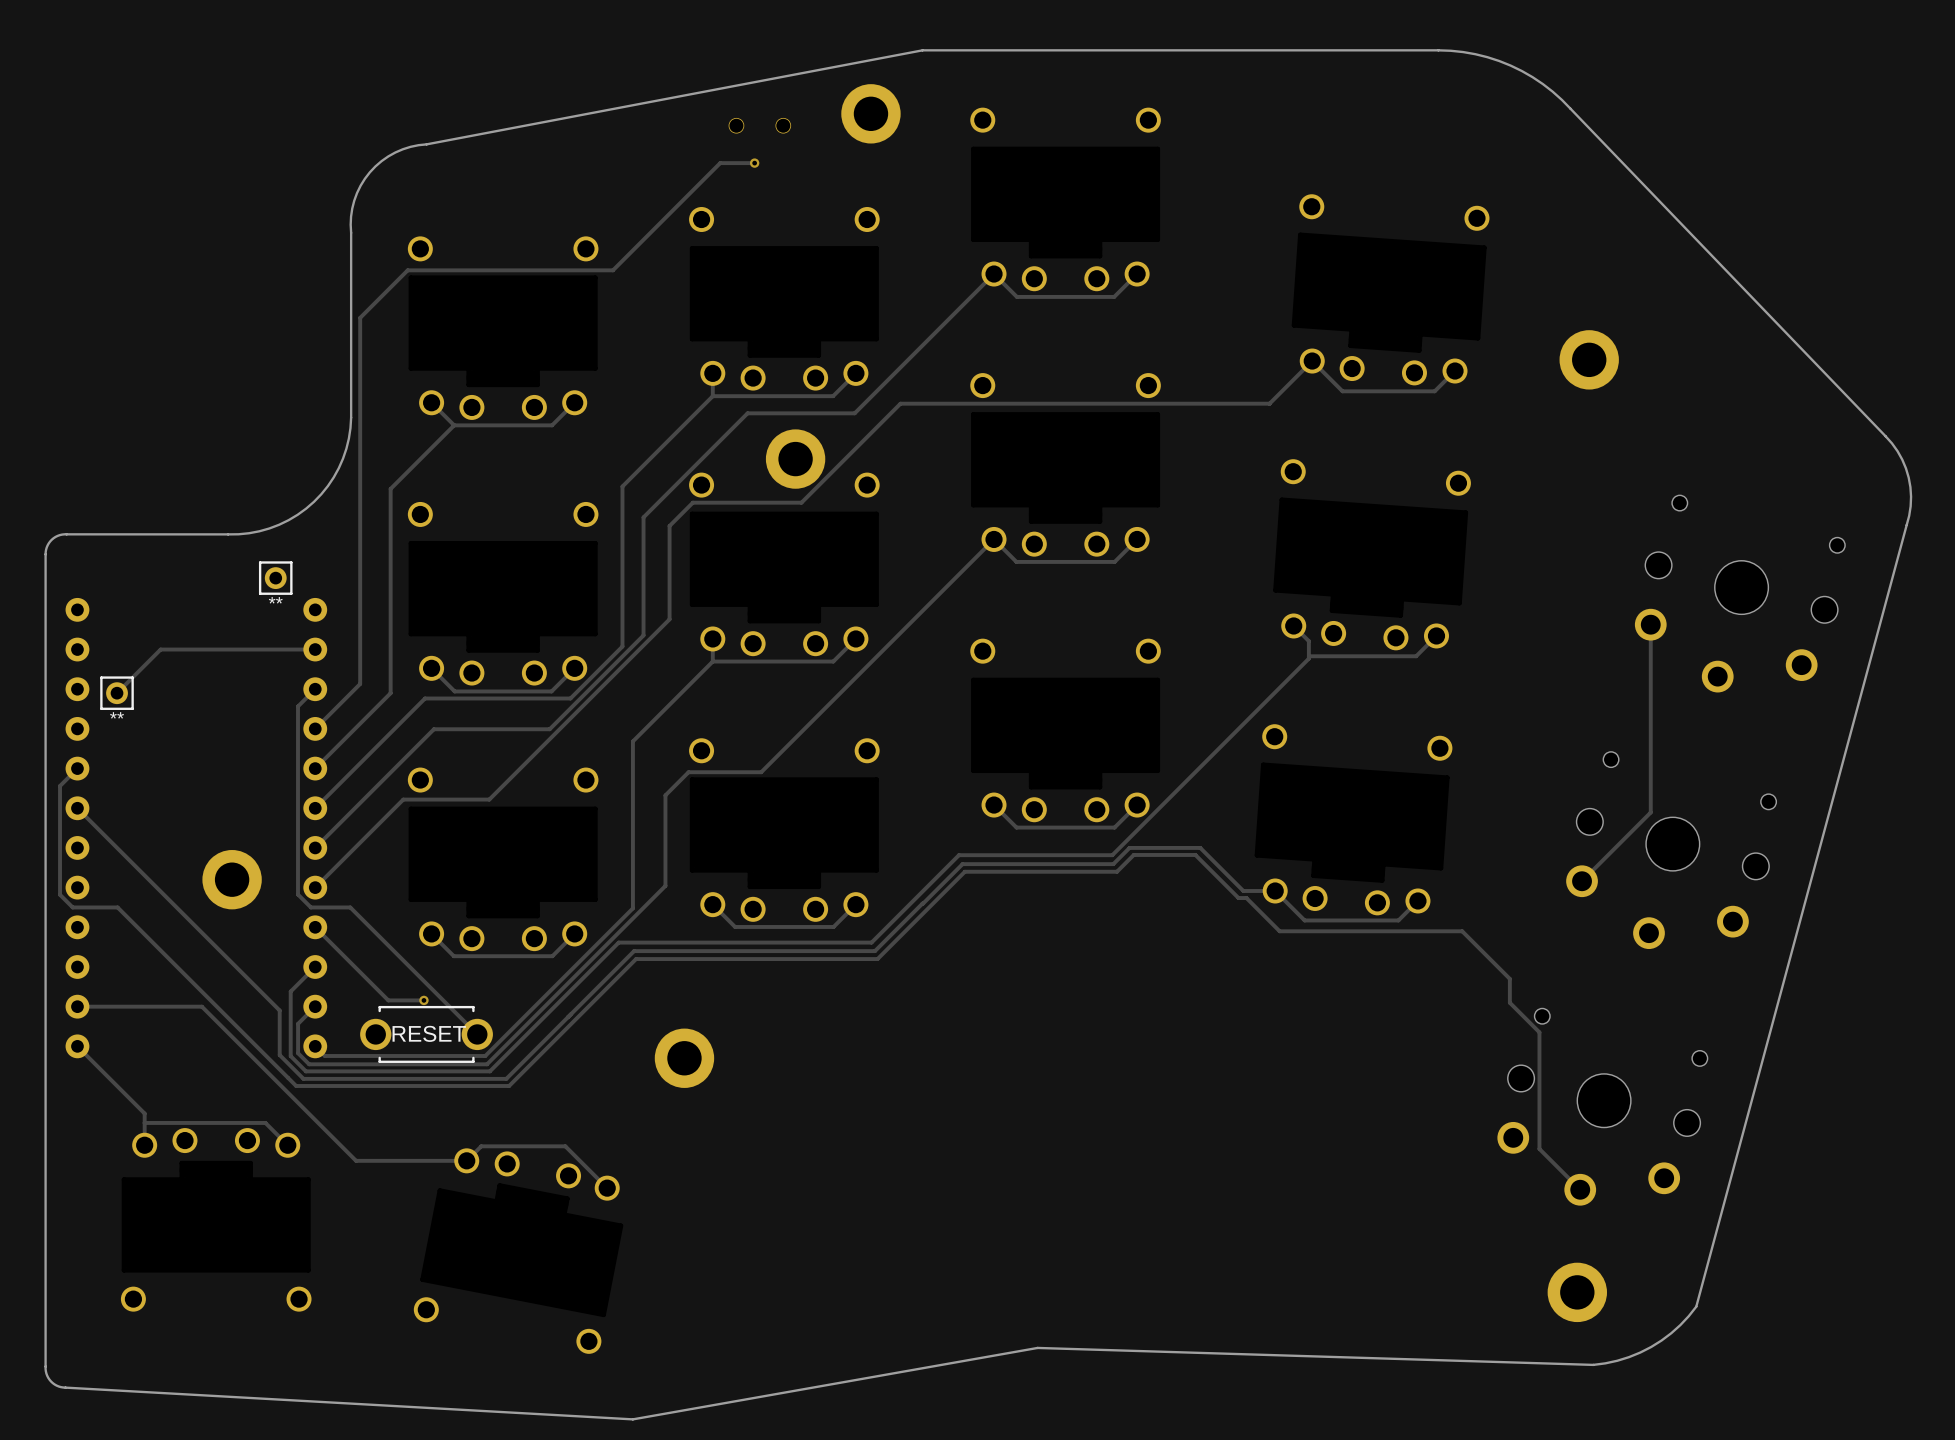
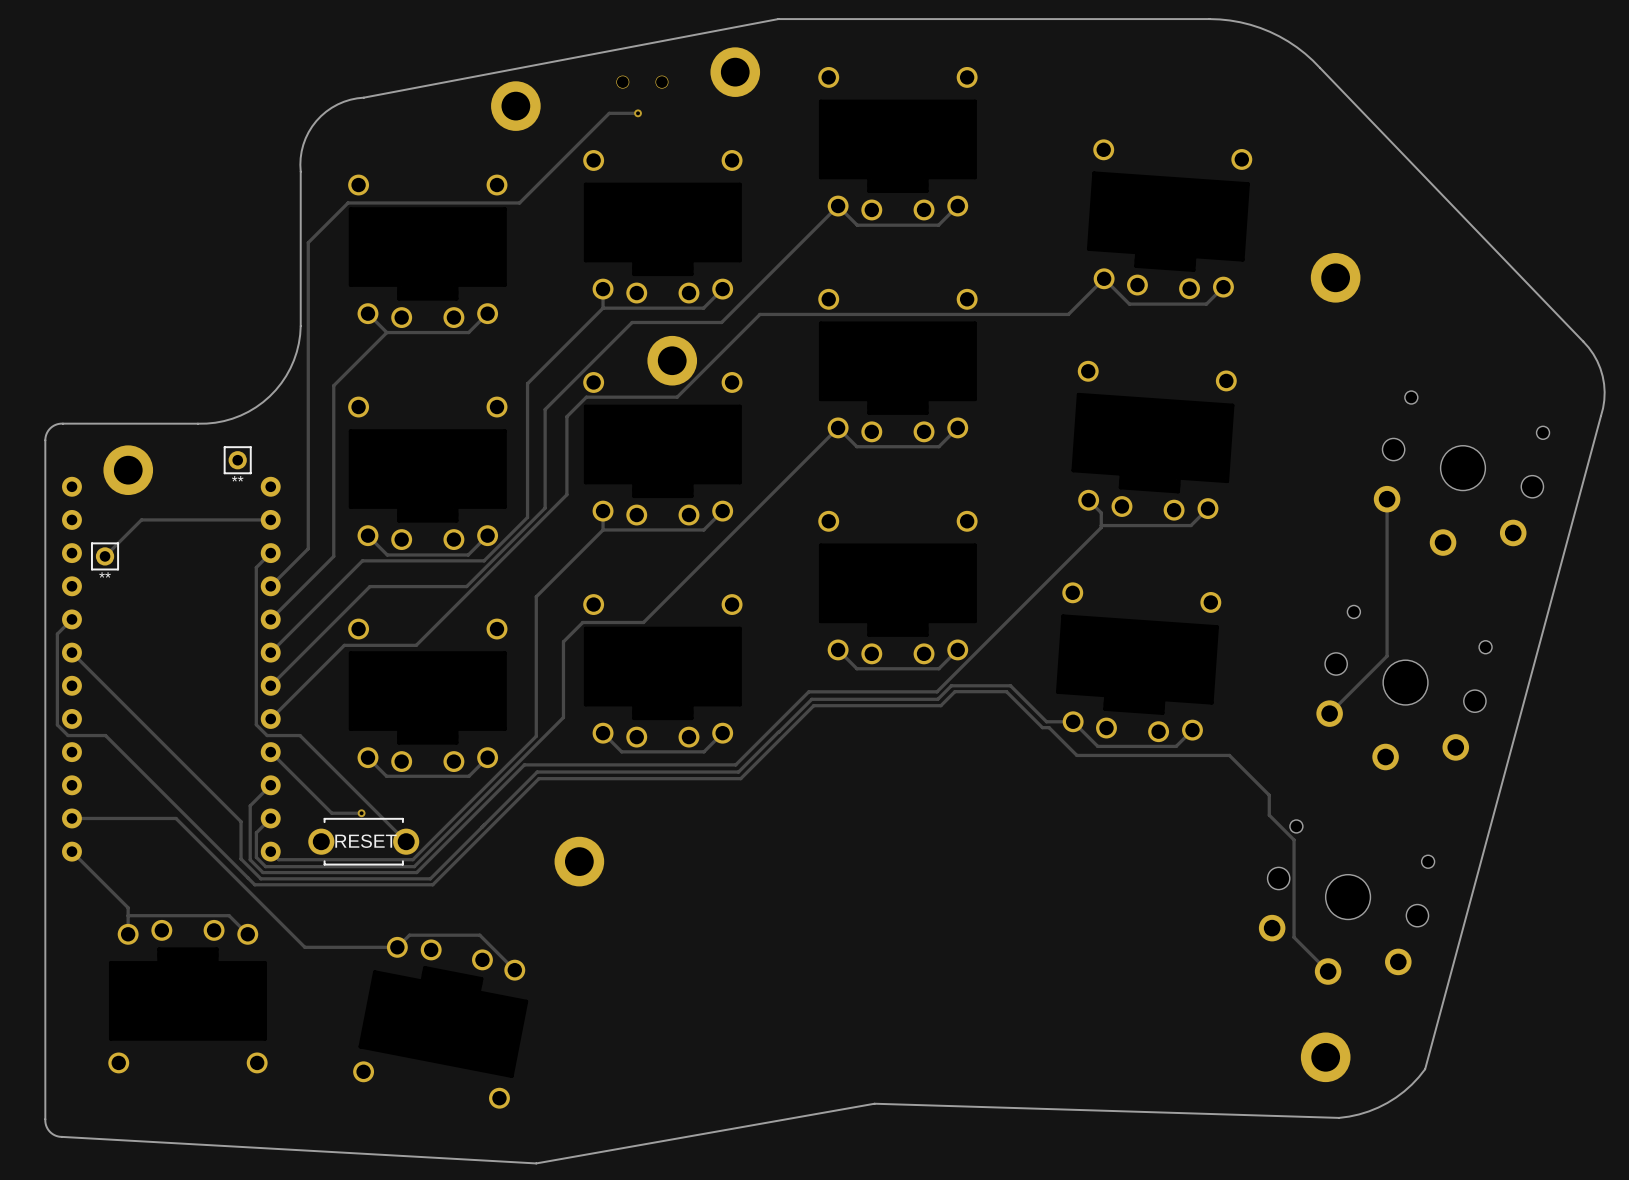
part: none -> (515, 106)
part position: (232, 879) -> (128, 470)

